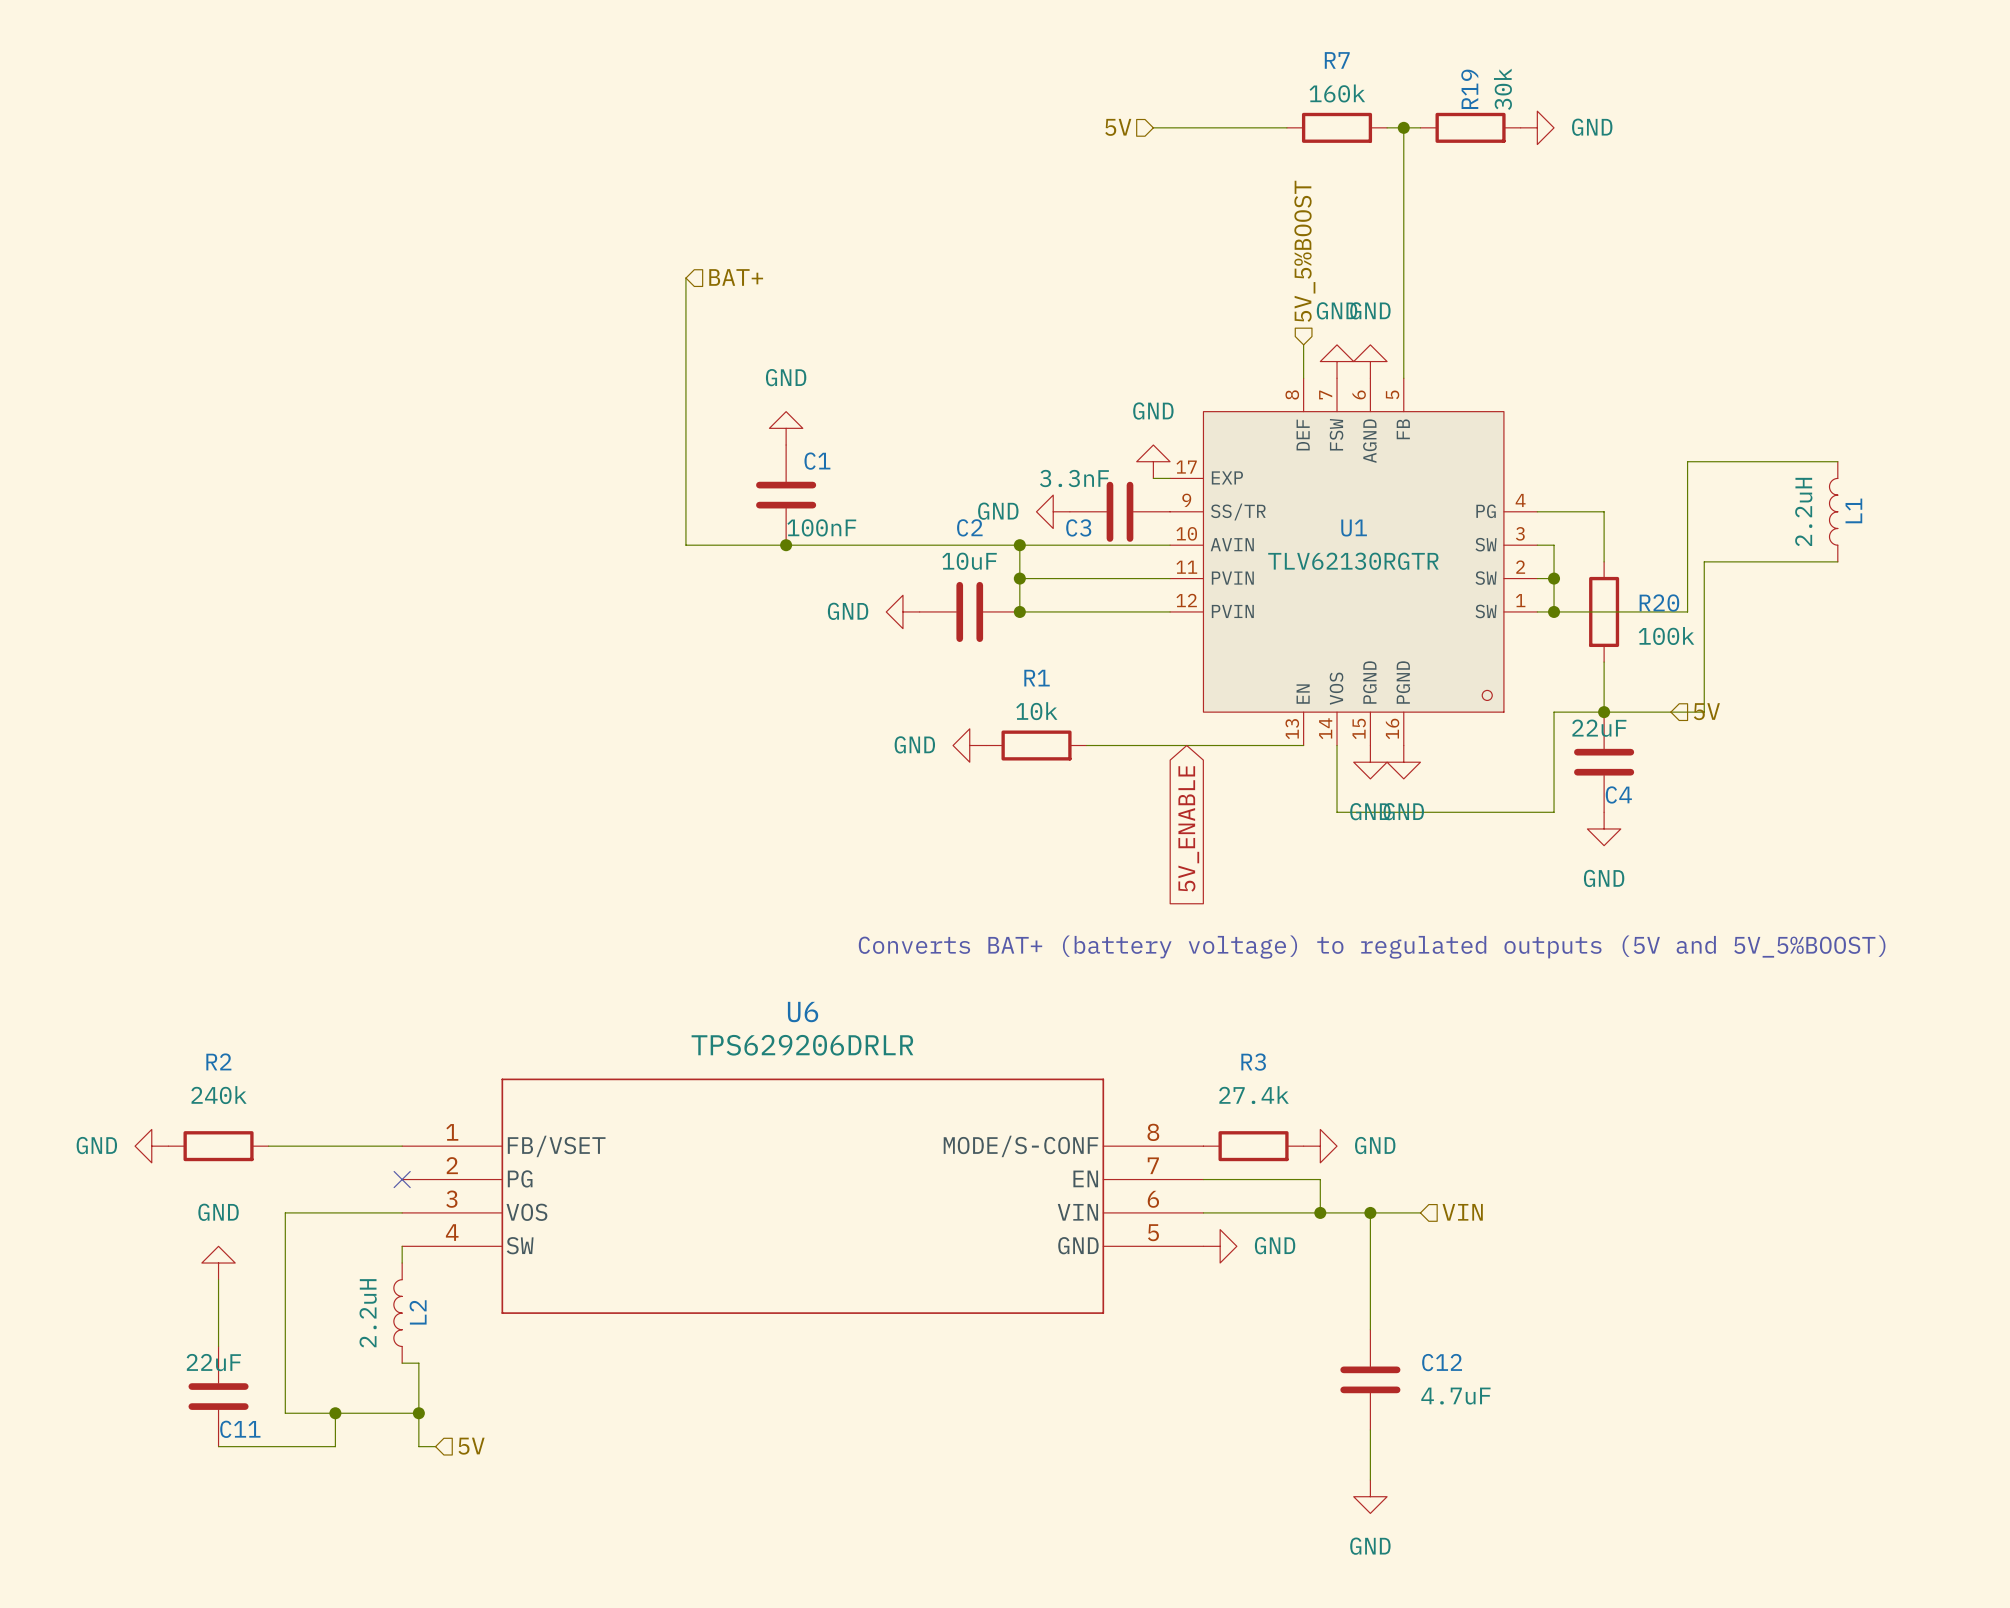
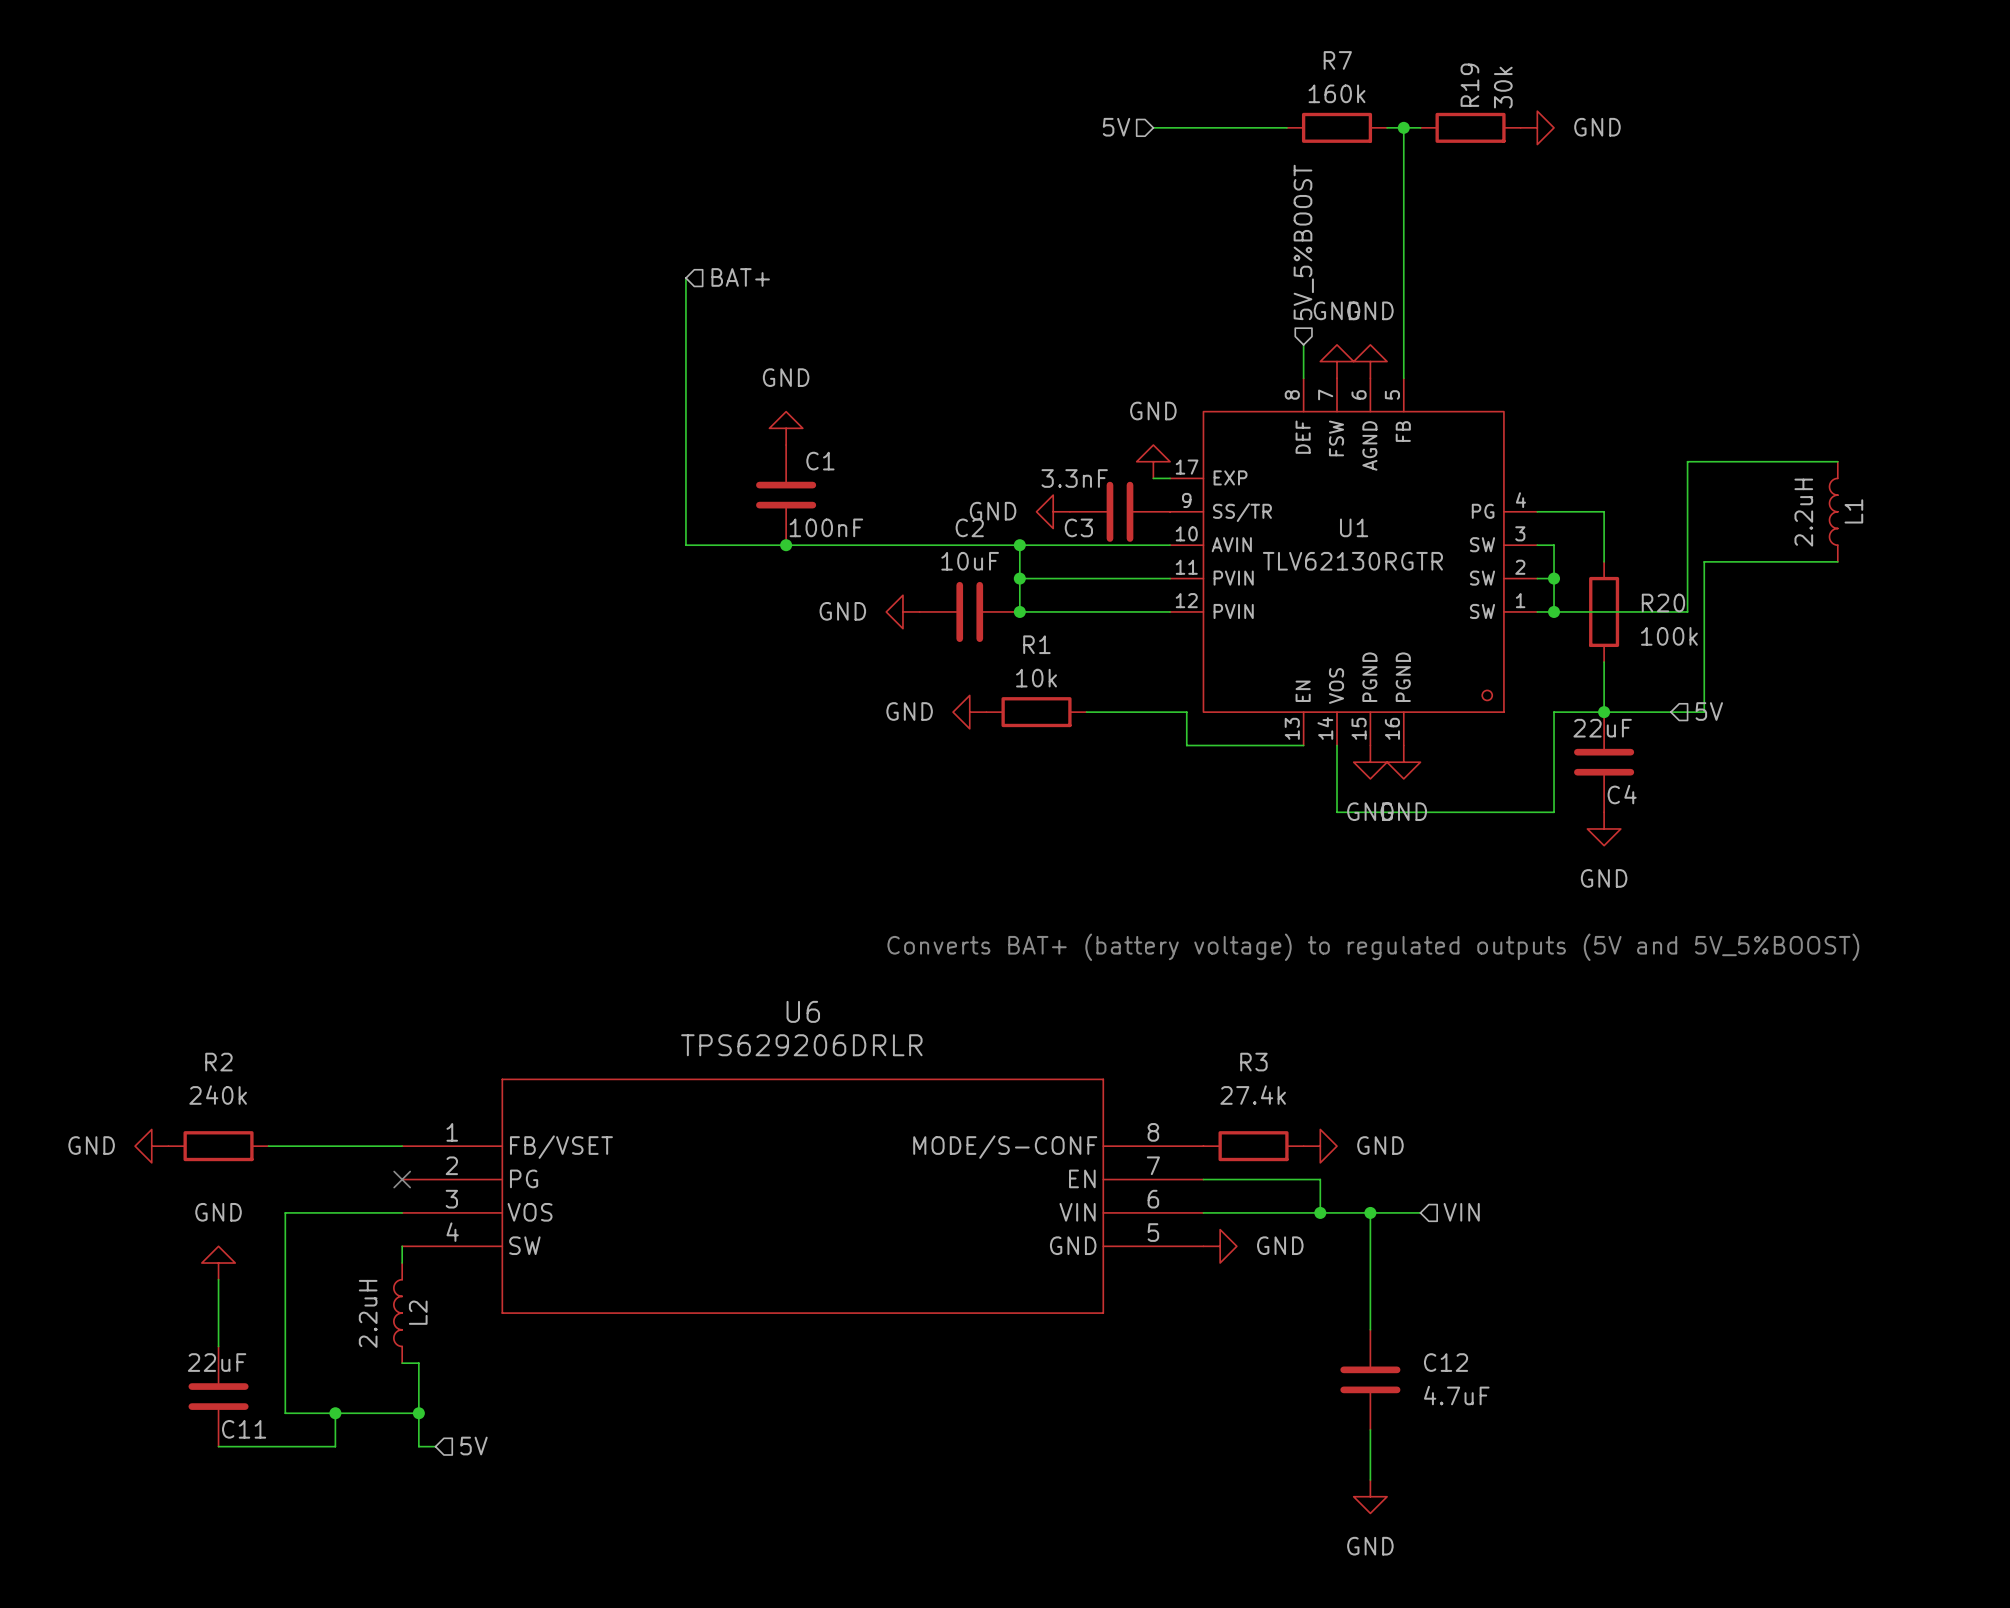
power symbol position: GND (969, 745) -> GND (969, 712)
R1 position: (1036, 745) -> (1036, 712)
wire: (1086, 745) (1186, 745) -> (1086, 712) (1186, 712) (1186, 745)
global label: 5V_ENABLE (1188, 828) -> none

